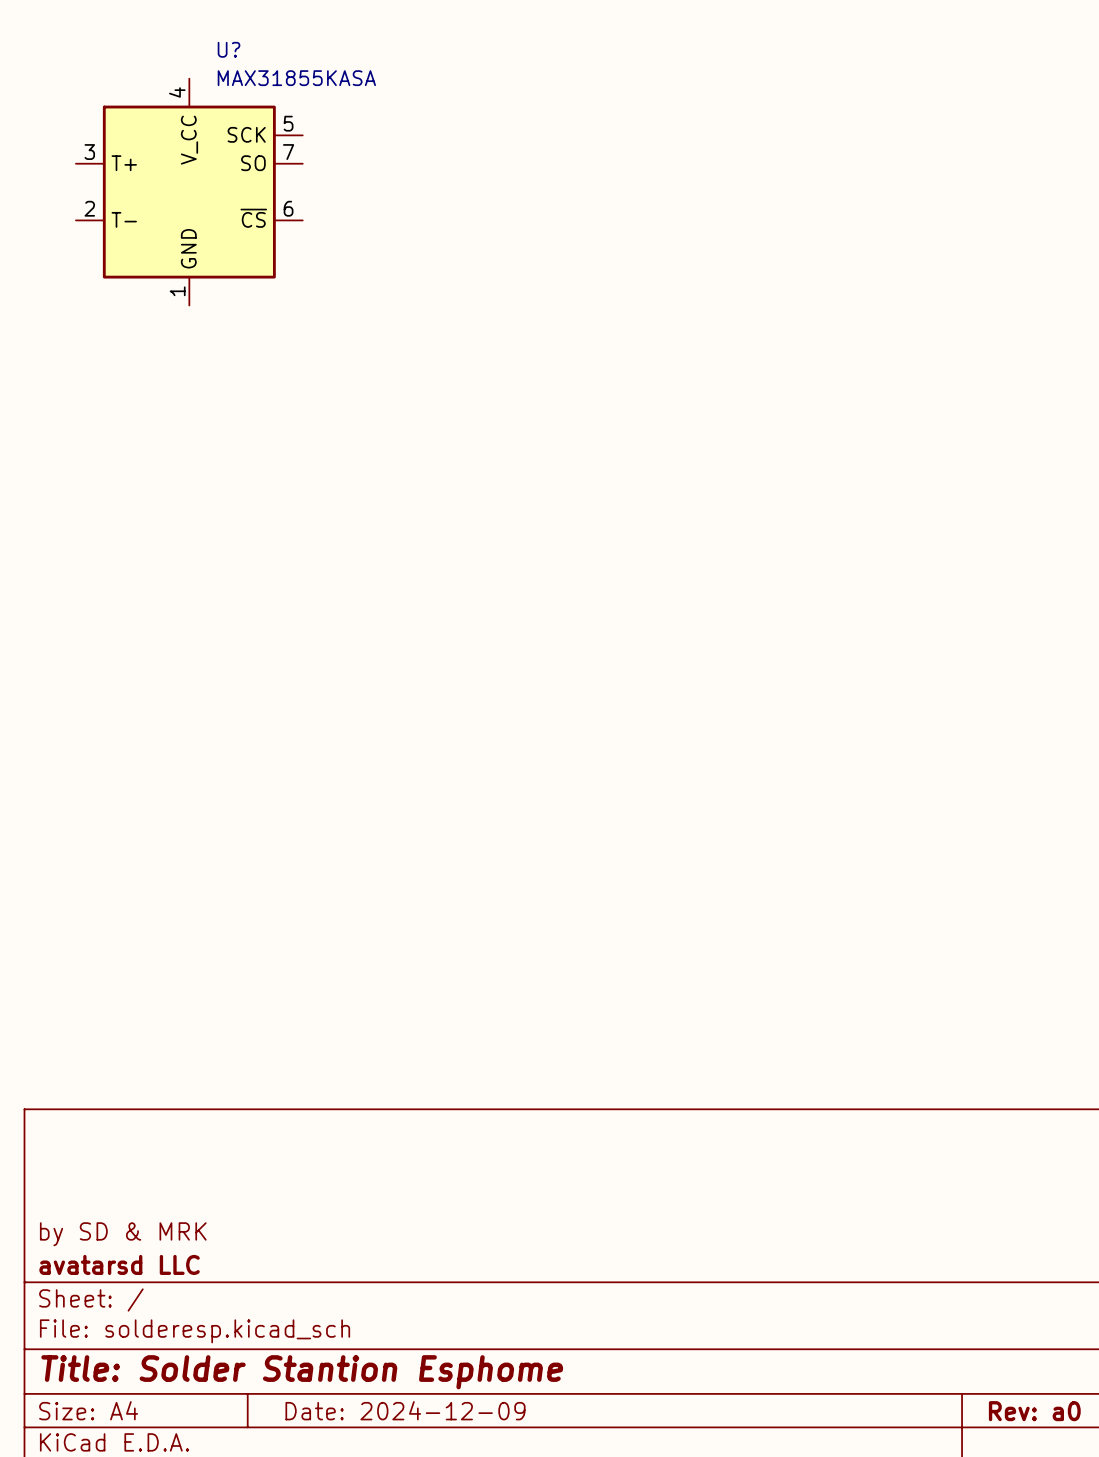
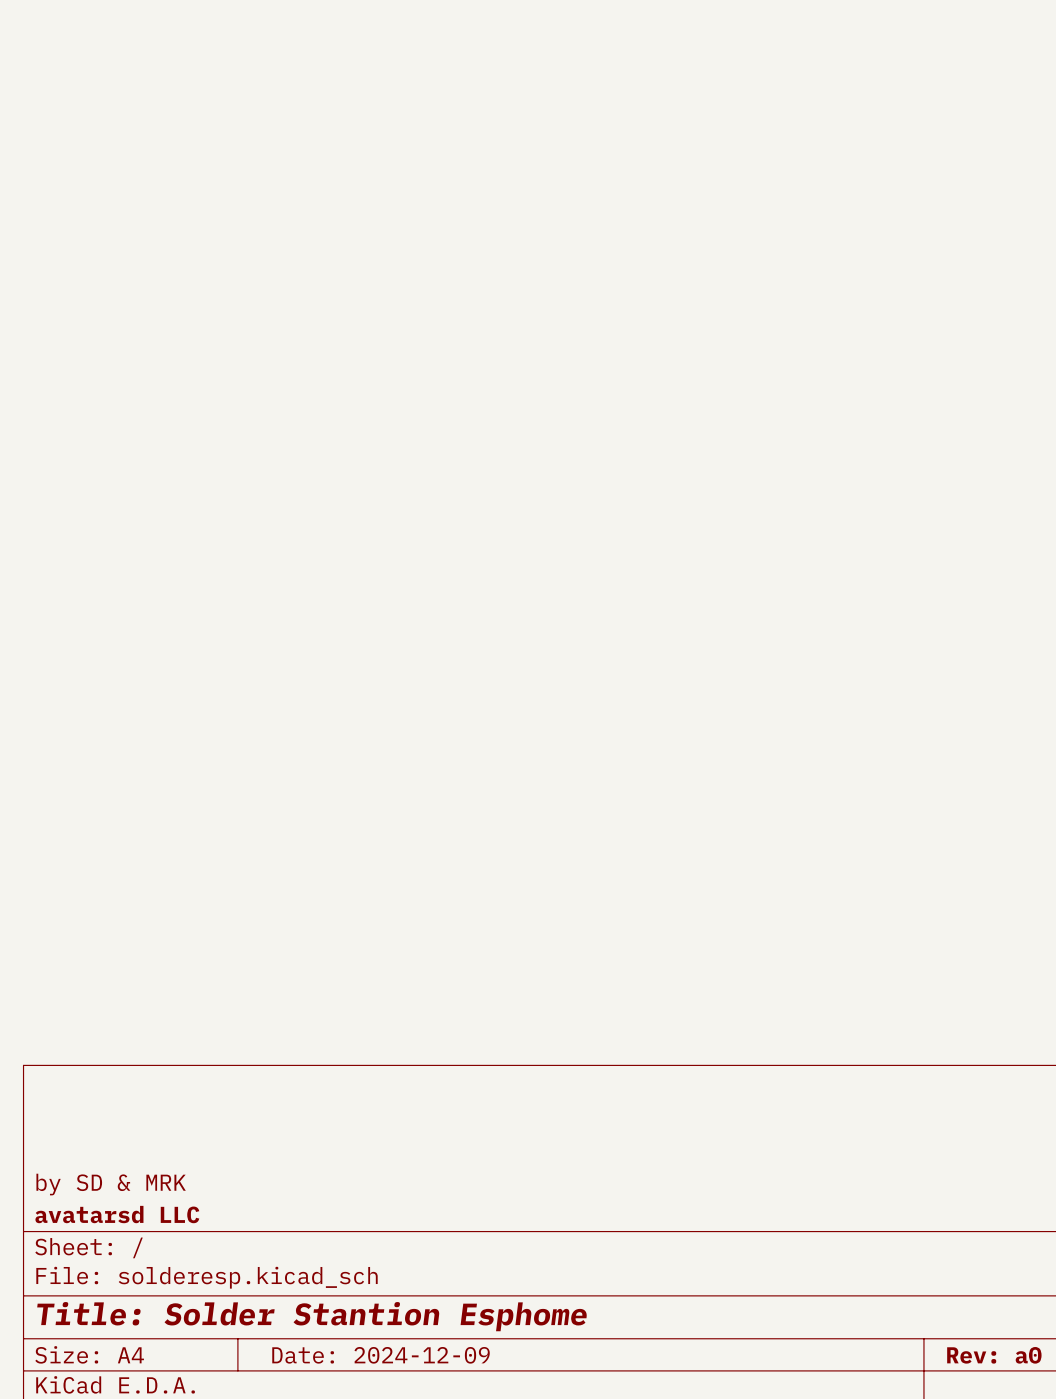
U?: MAX31855KASA (189, 192) -> none

